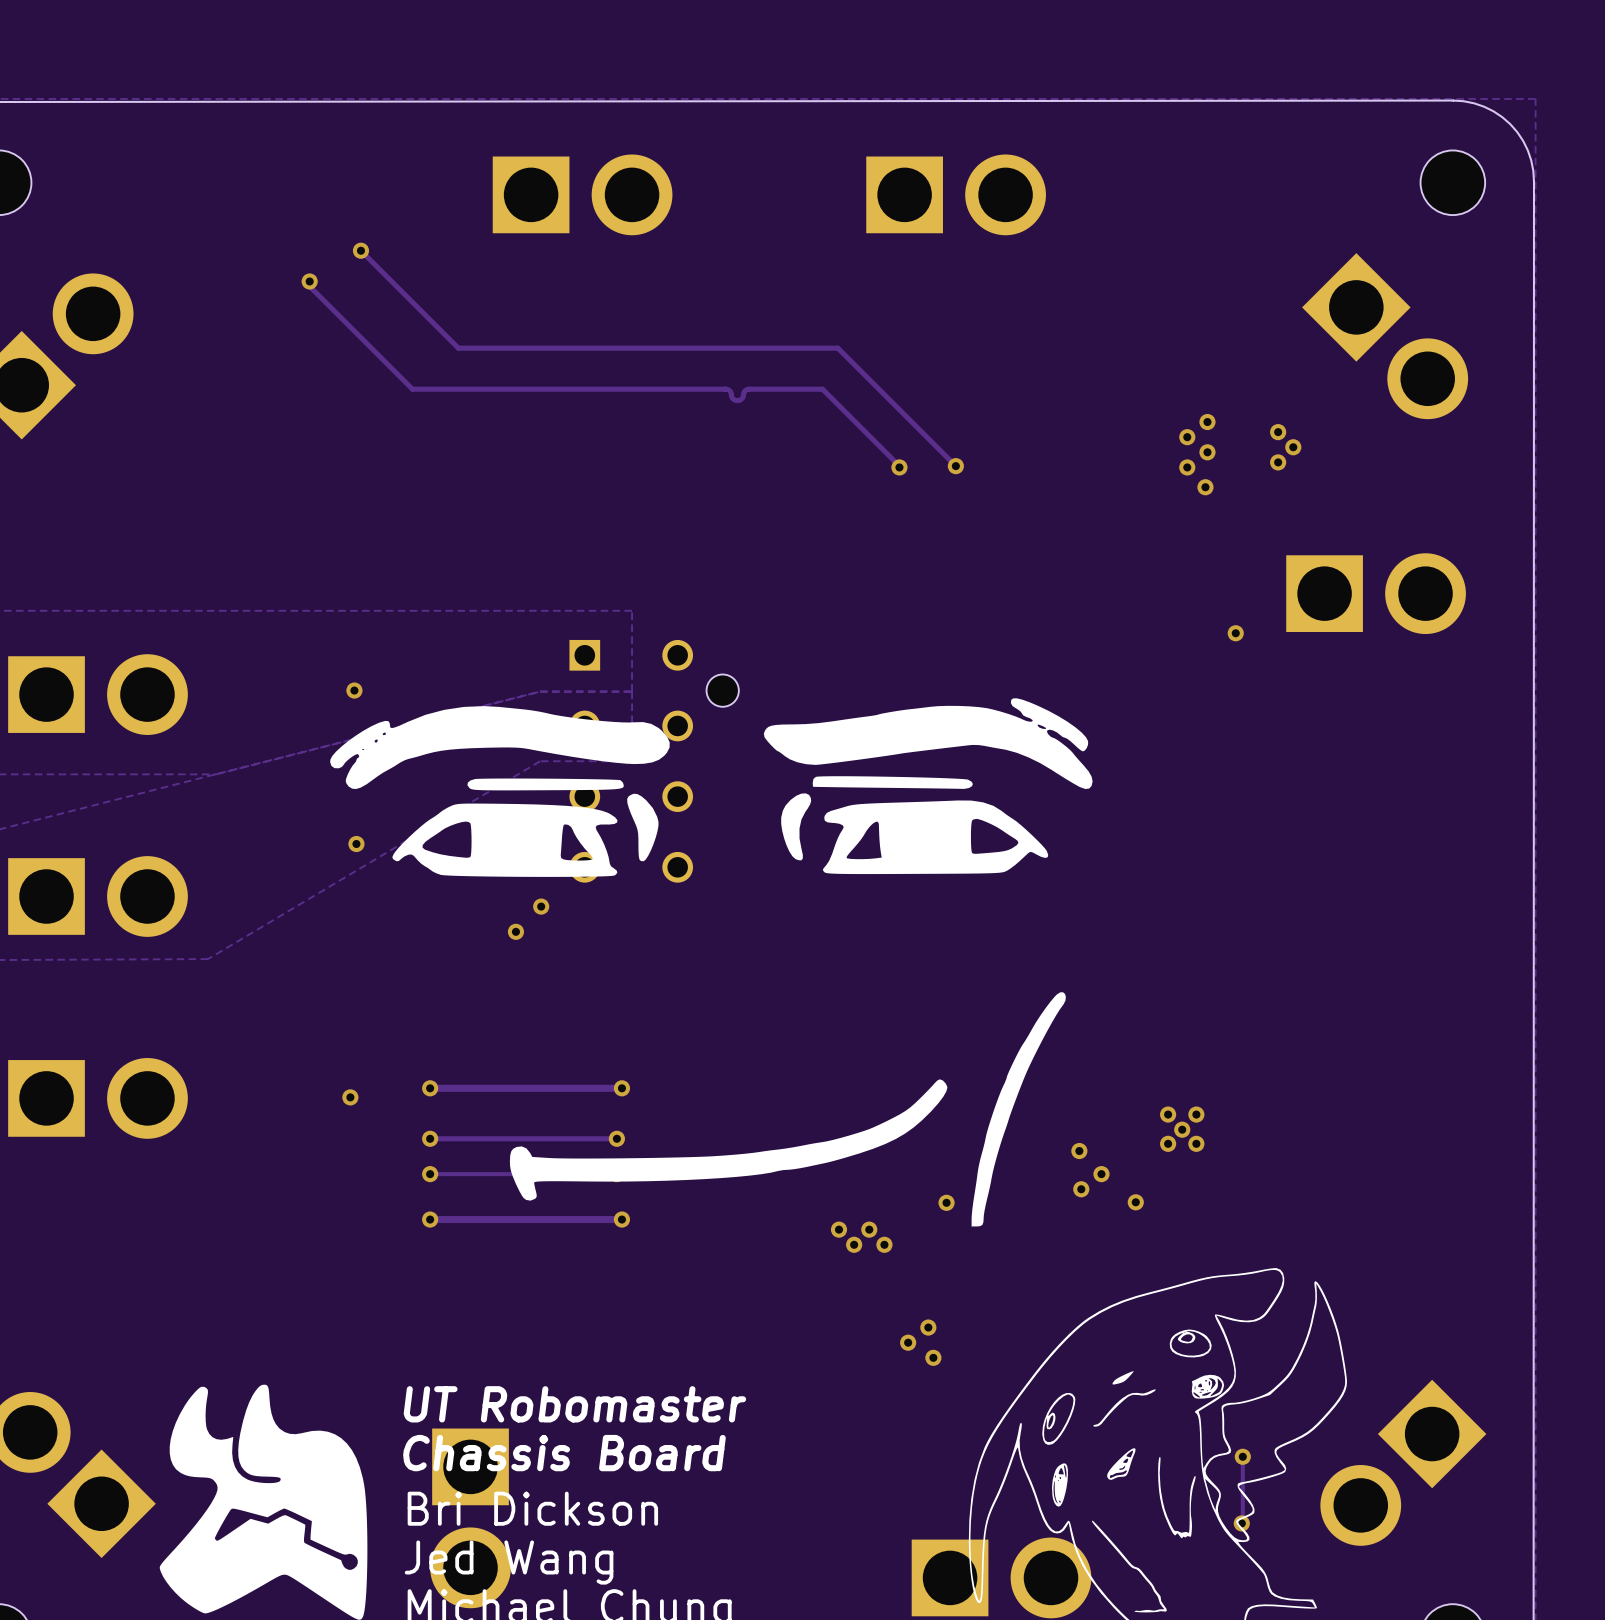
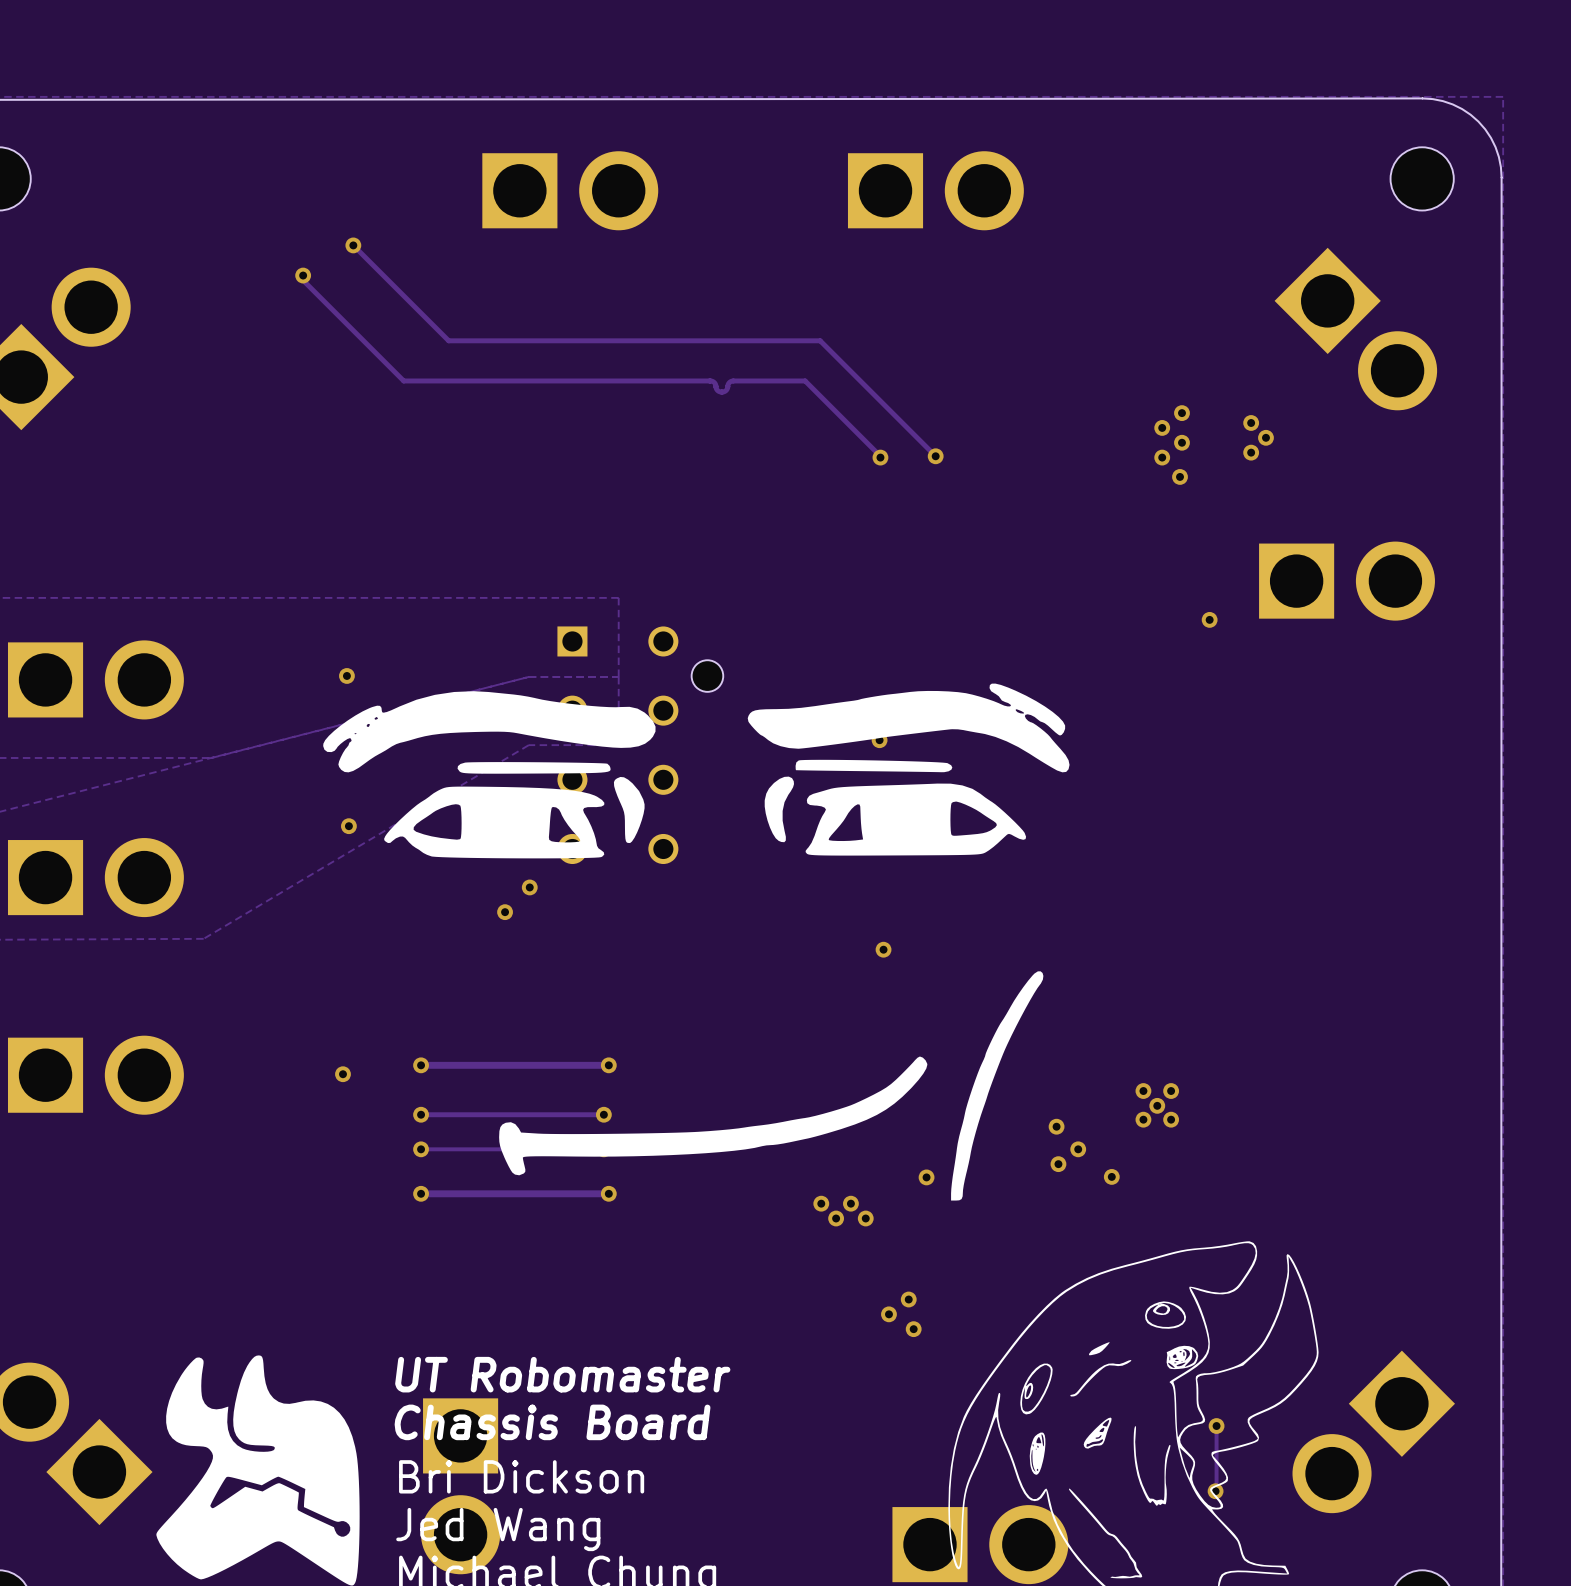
via: none -> (879, 740)
via: none -> (883, 949)

